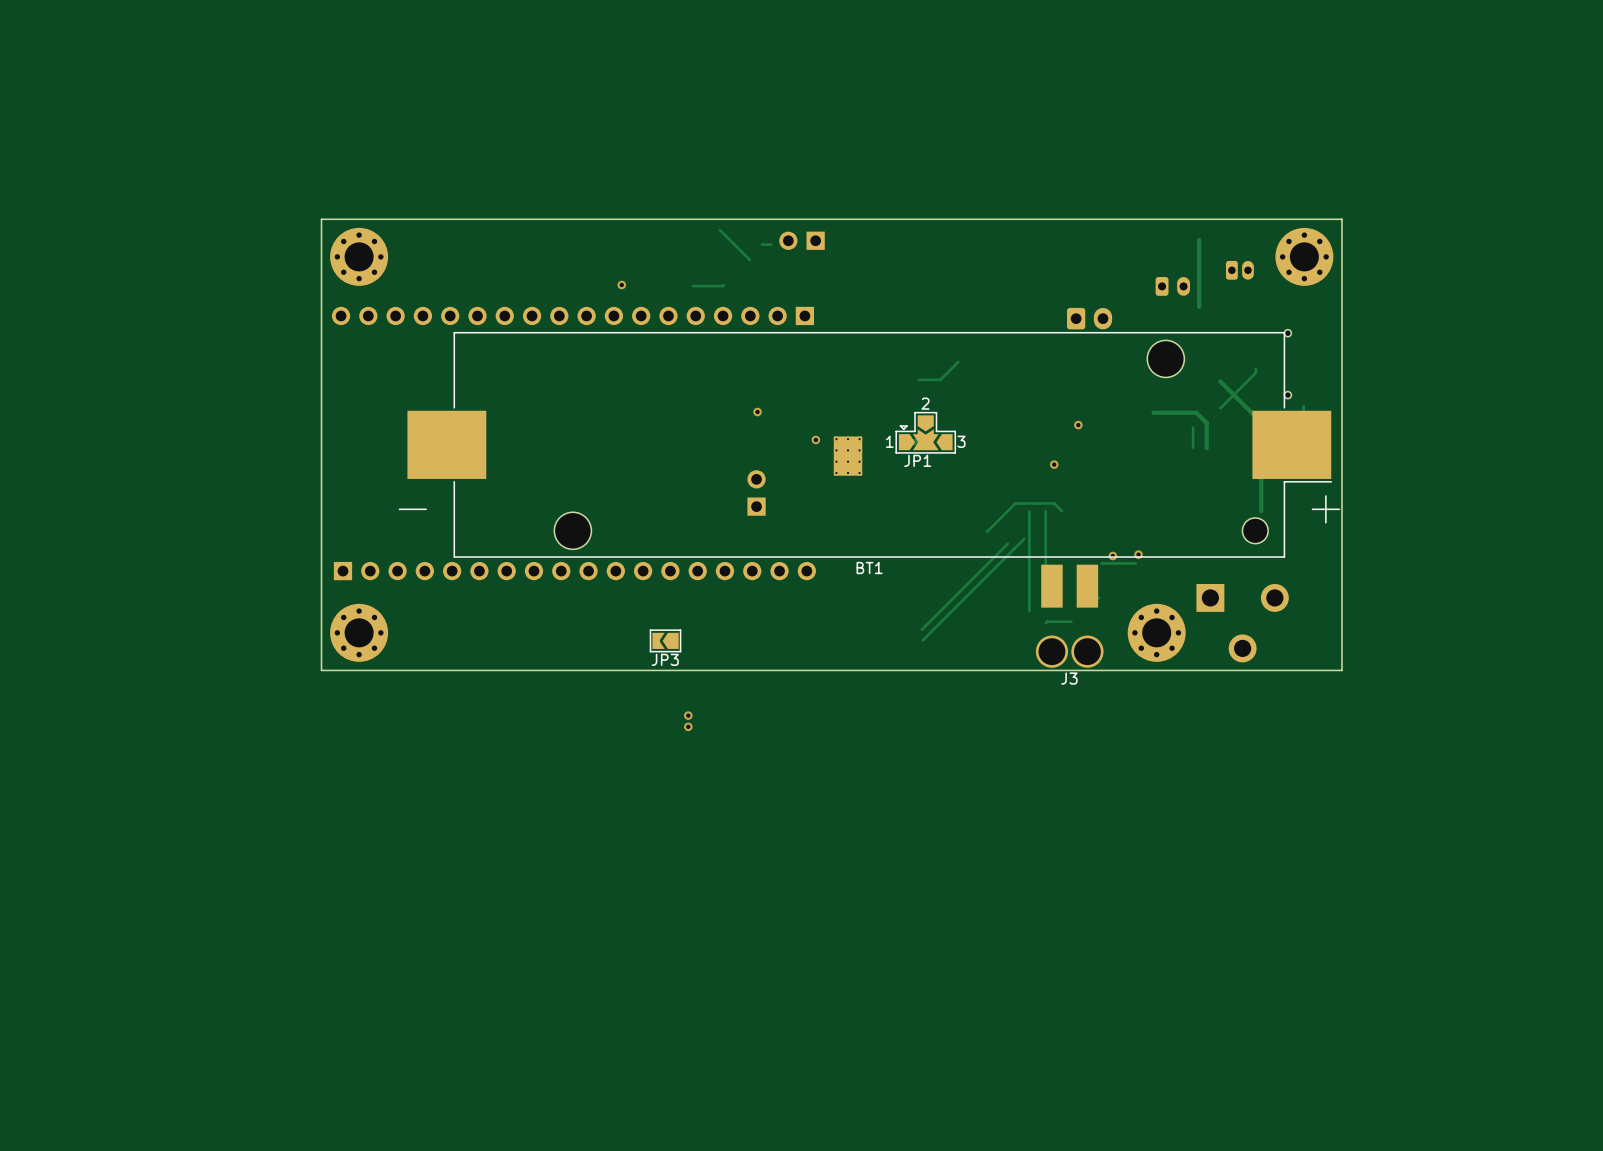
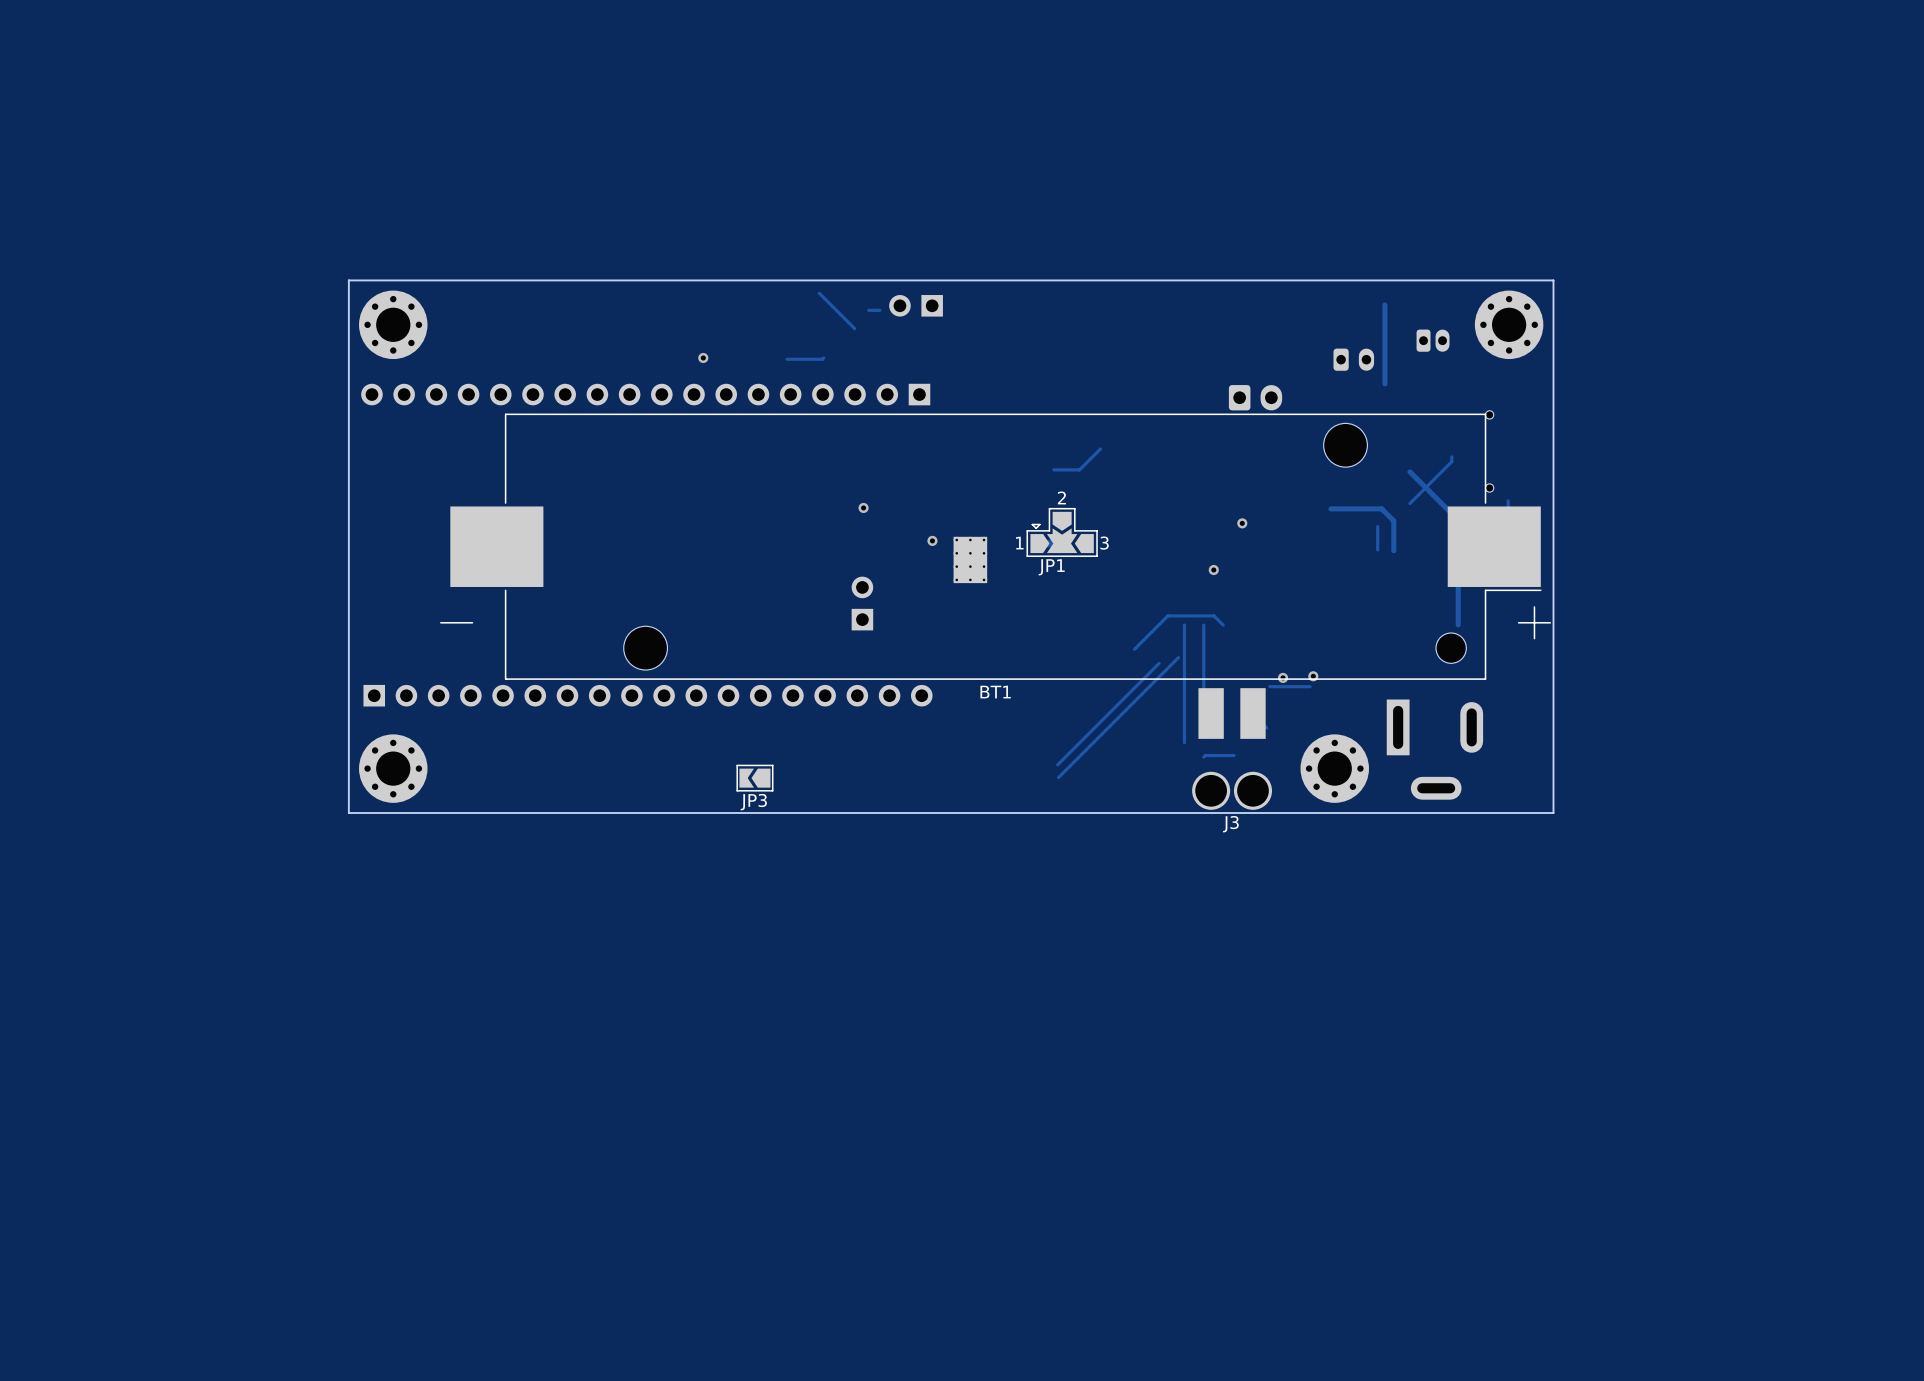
part footprint: [1196, 583, 1289, 663] -> [1386, 699, 1484, 800]
via: (688, 715) -> none
via: (688, 726) -> none

